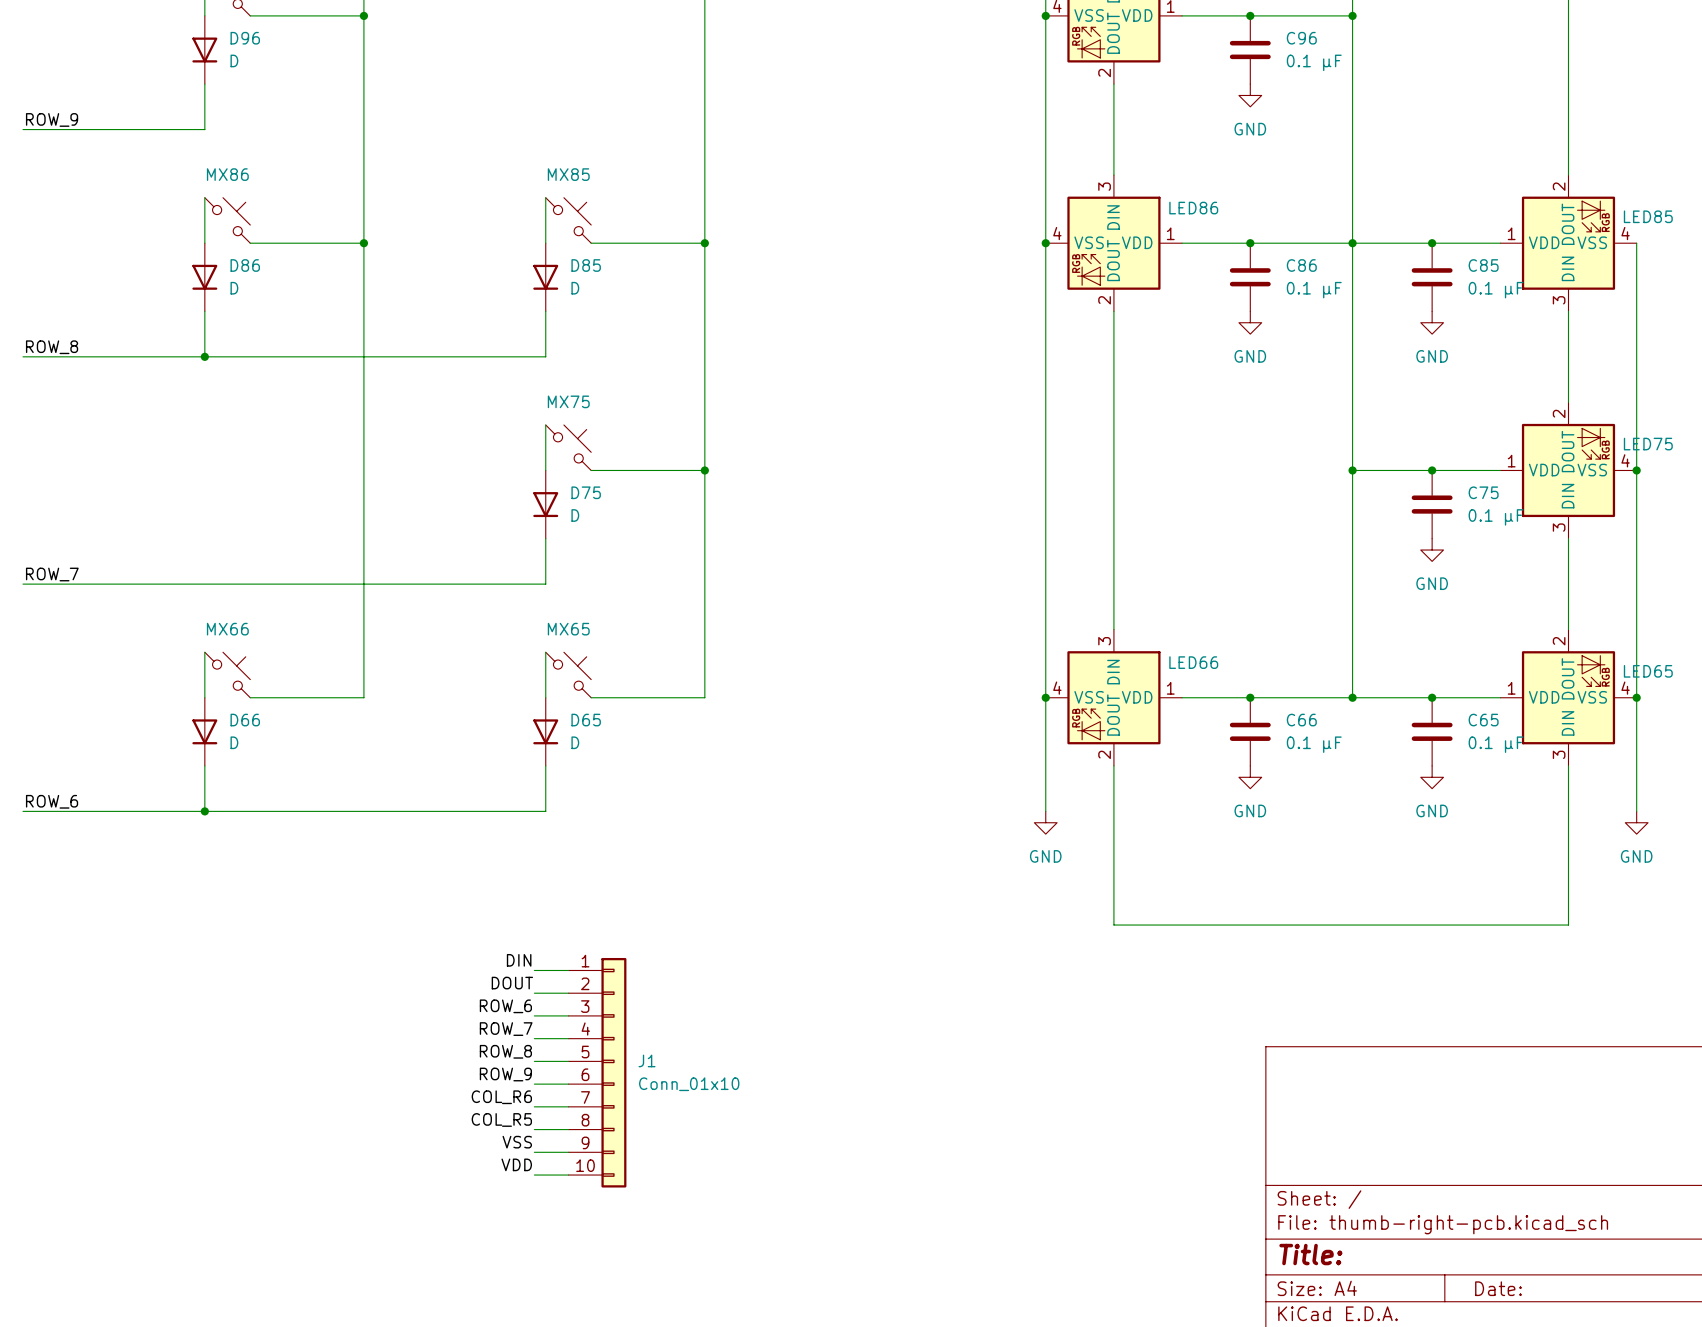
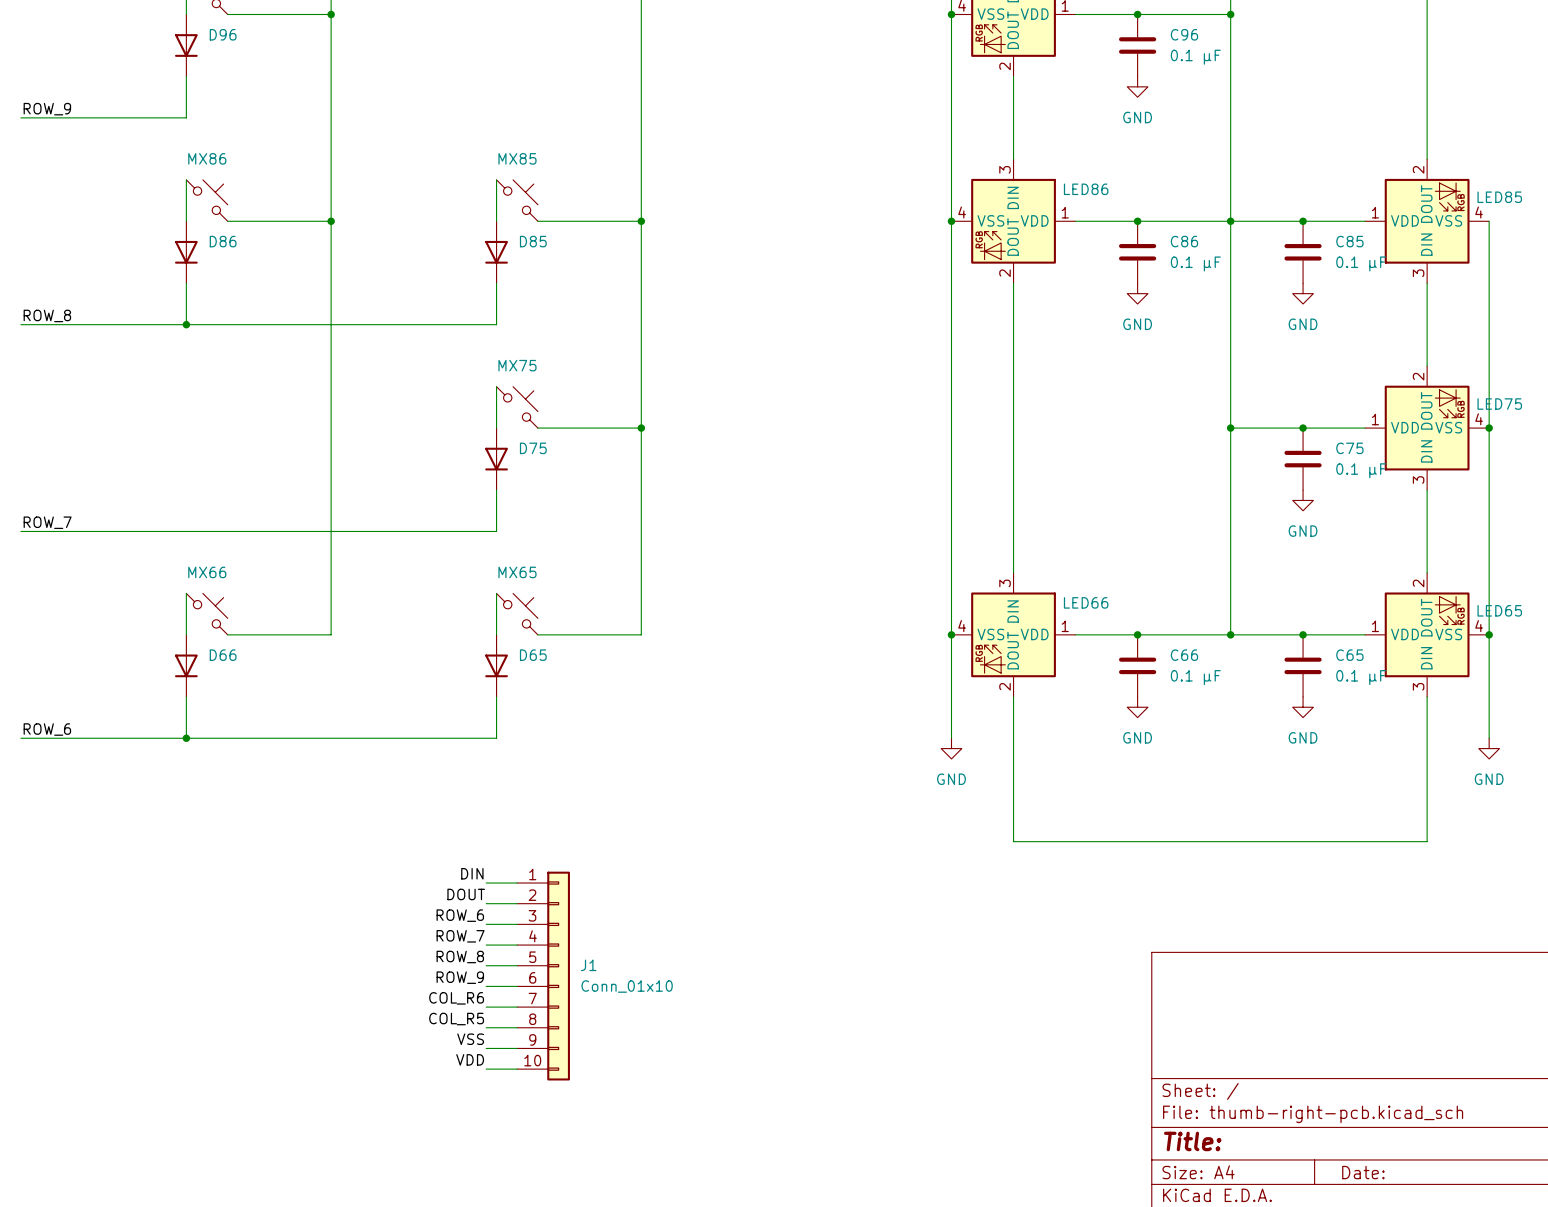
D96 value: D (234, 60) -> none
D86 value: D (234, 288) -> none
D85 value: D (575, 288) -> none
D75 value: D (575, 515) -> none
D66 value: D (234, 742) -> none
D65 value: D (575, 742) -> none

